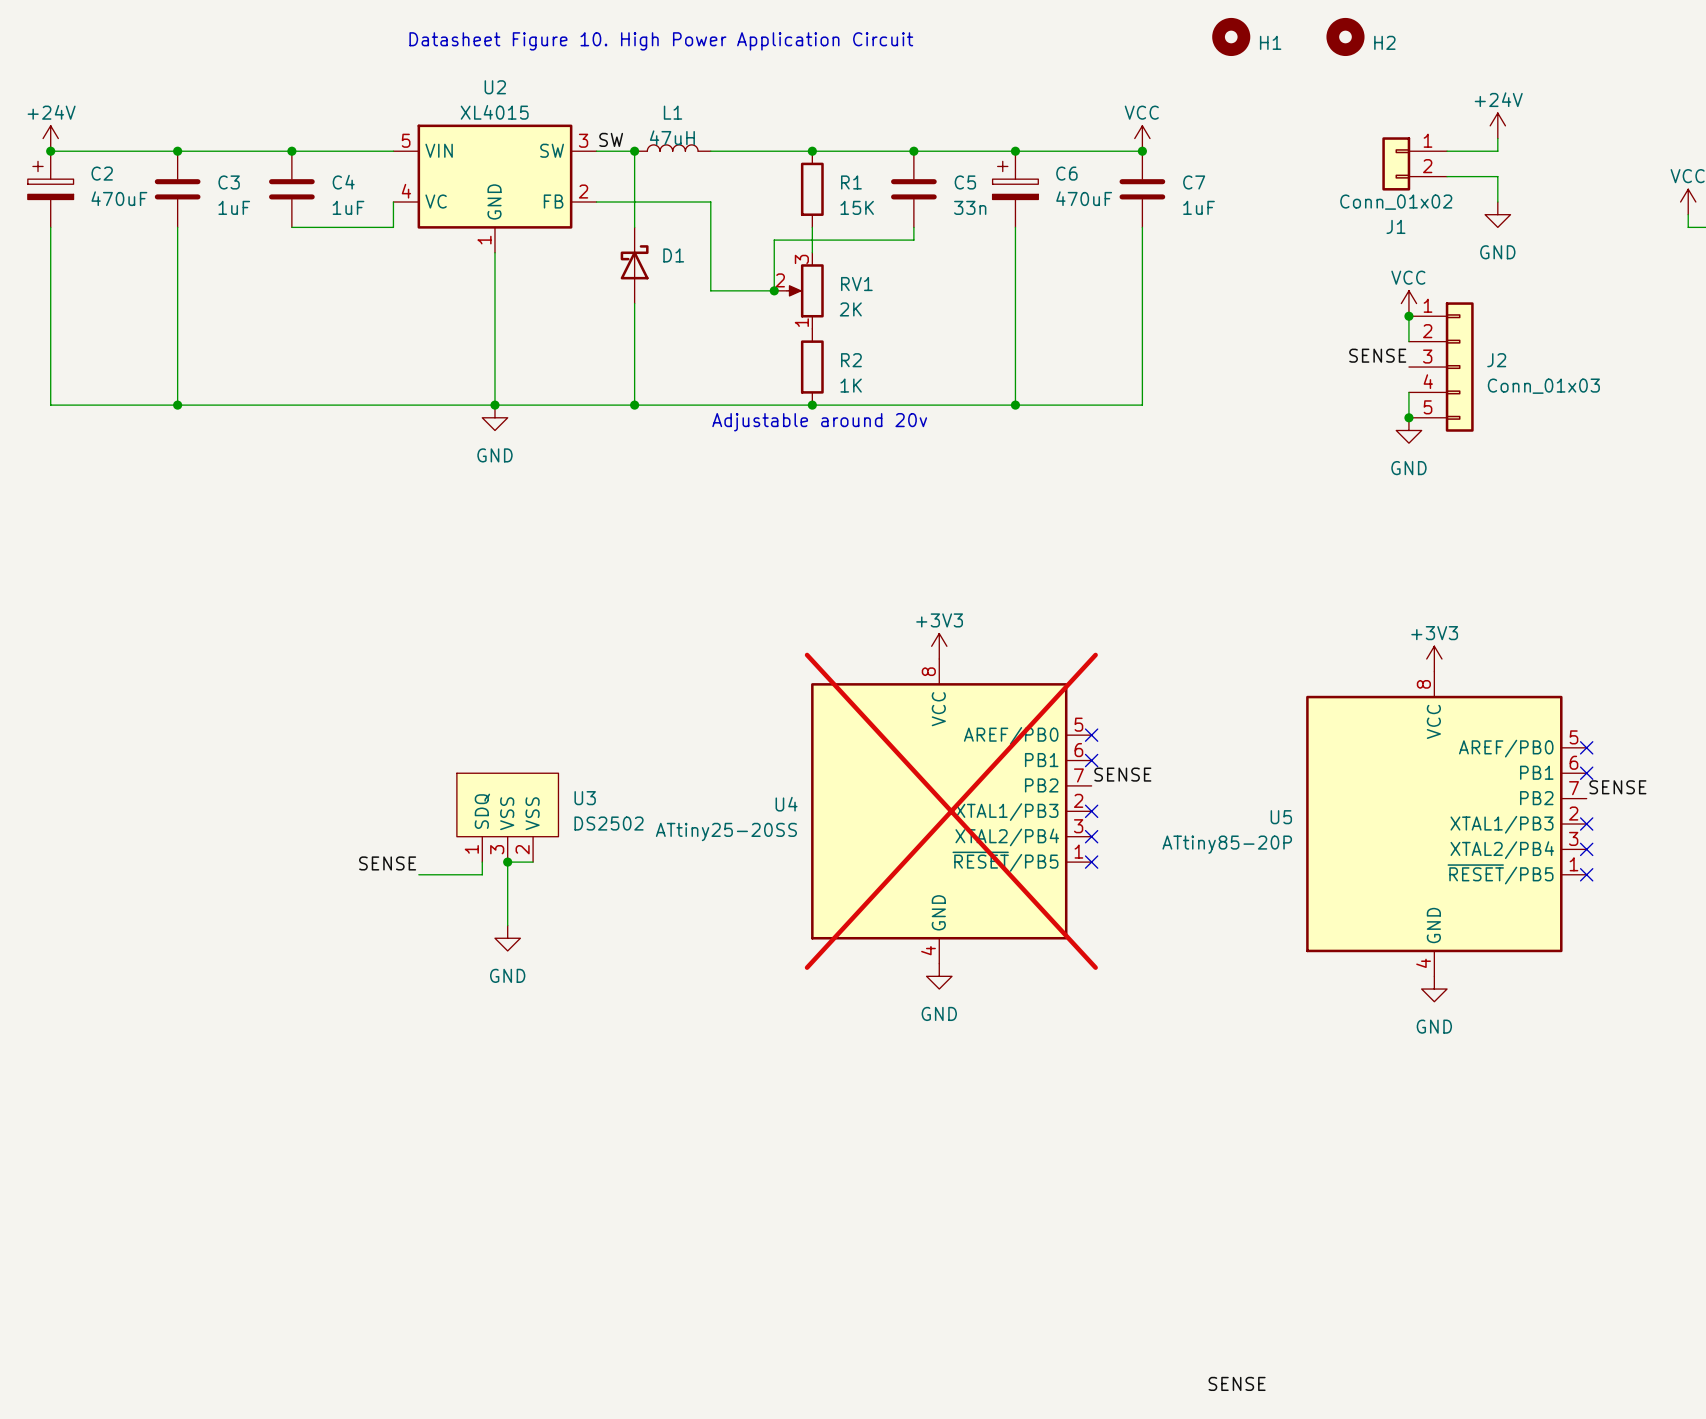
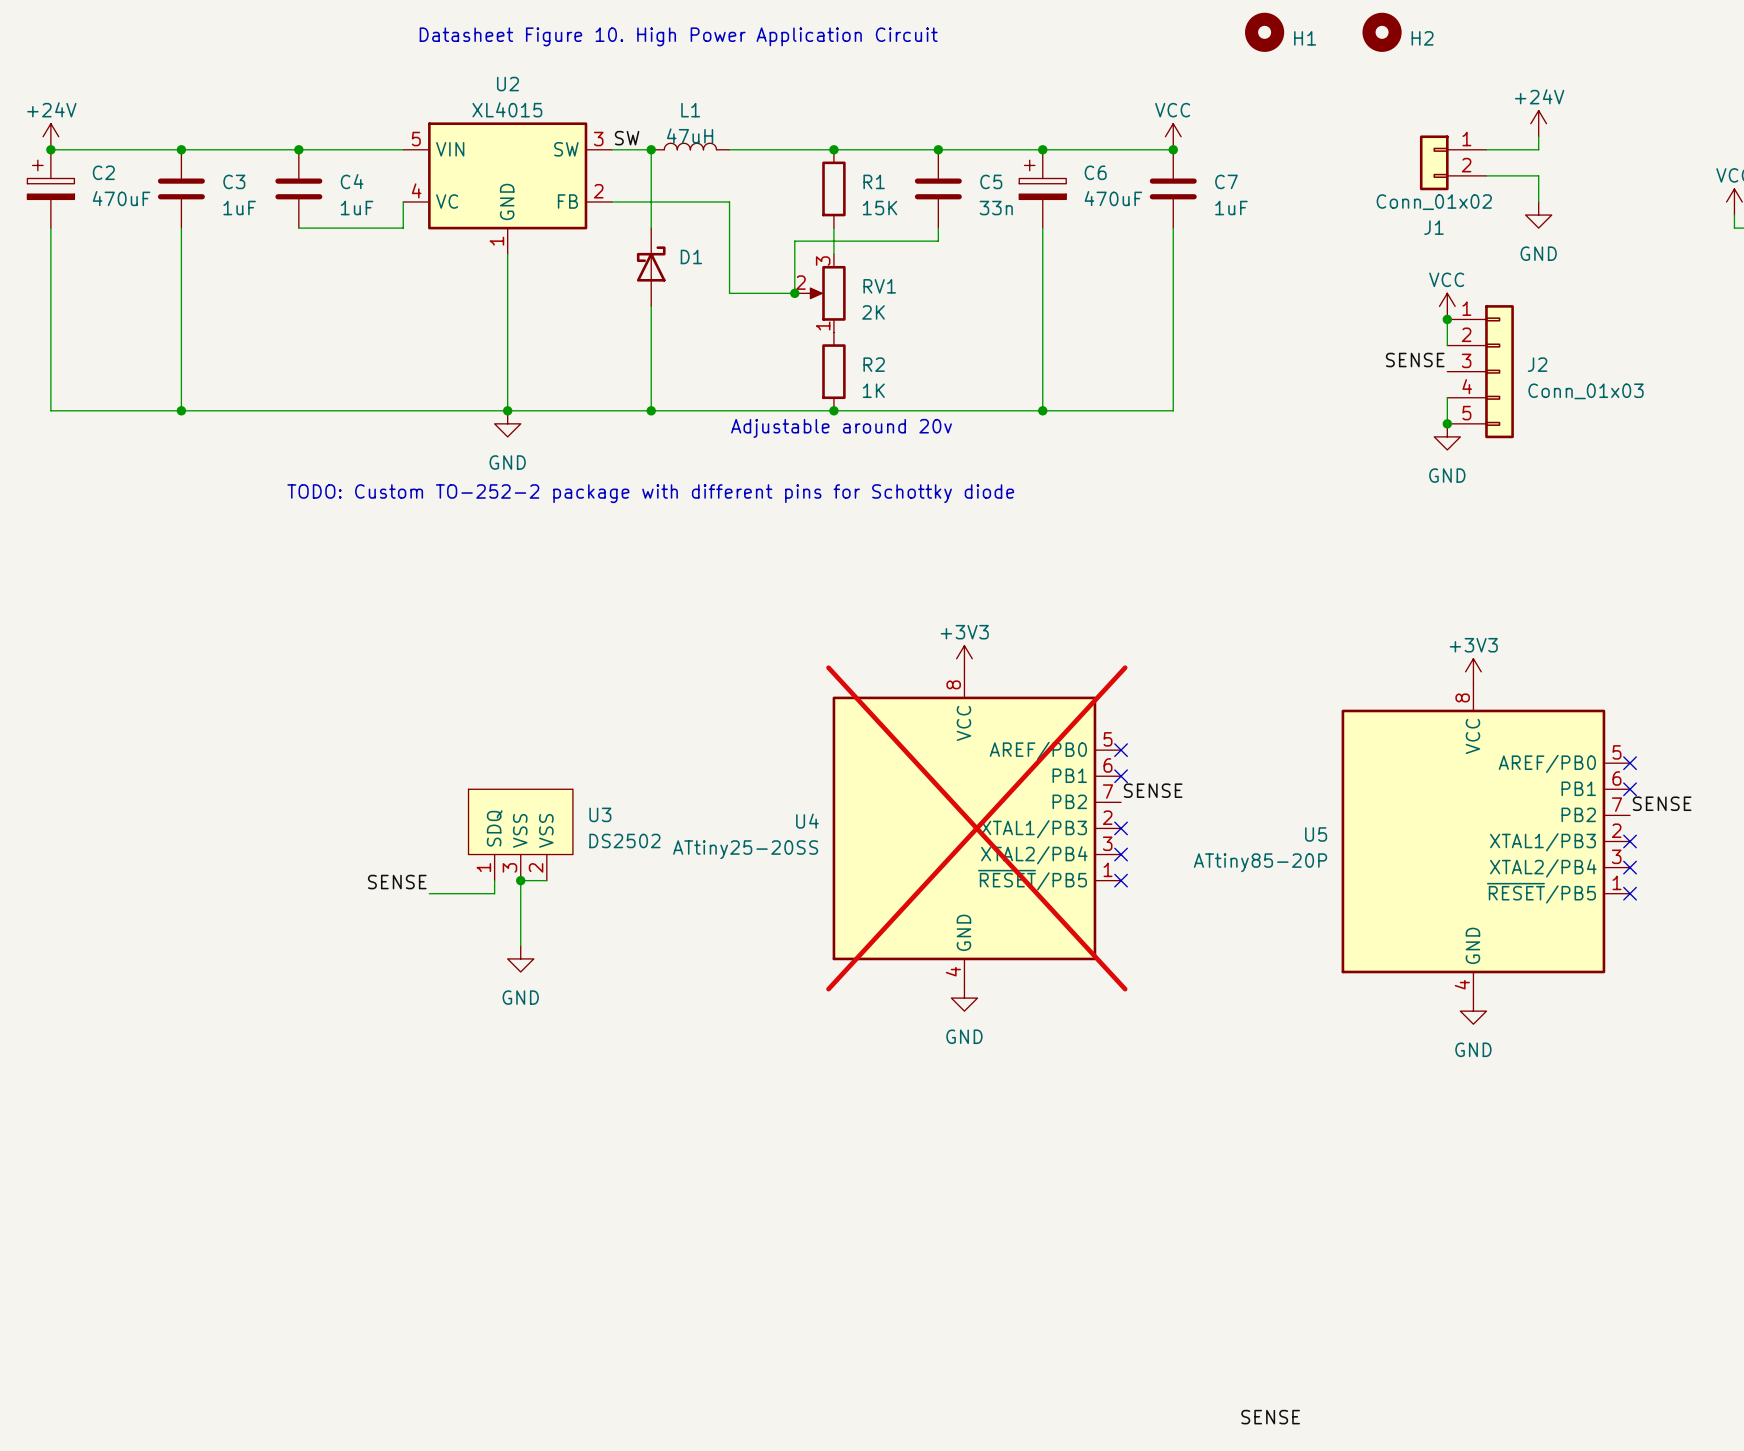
text: none -> TODO: Custom TO-252-2 package with different pins for Schottky diode (650, 493)

